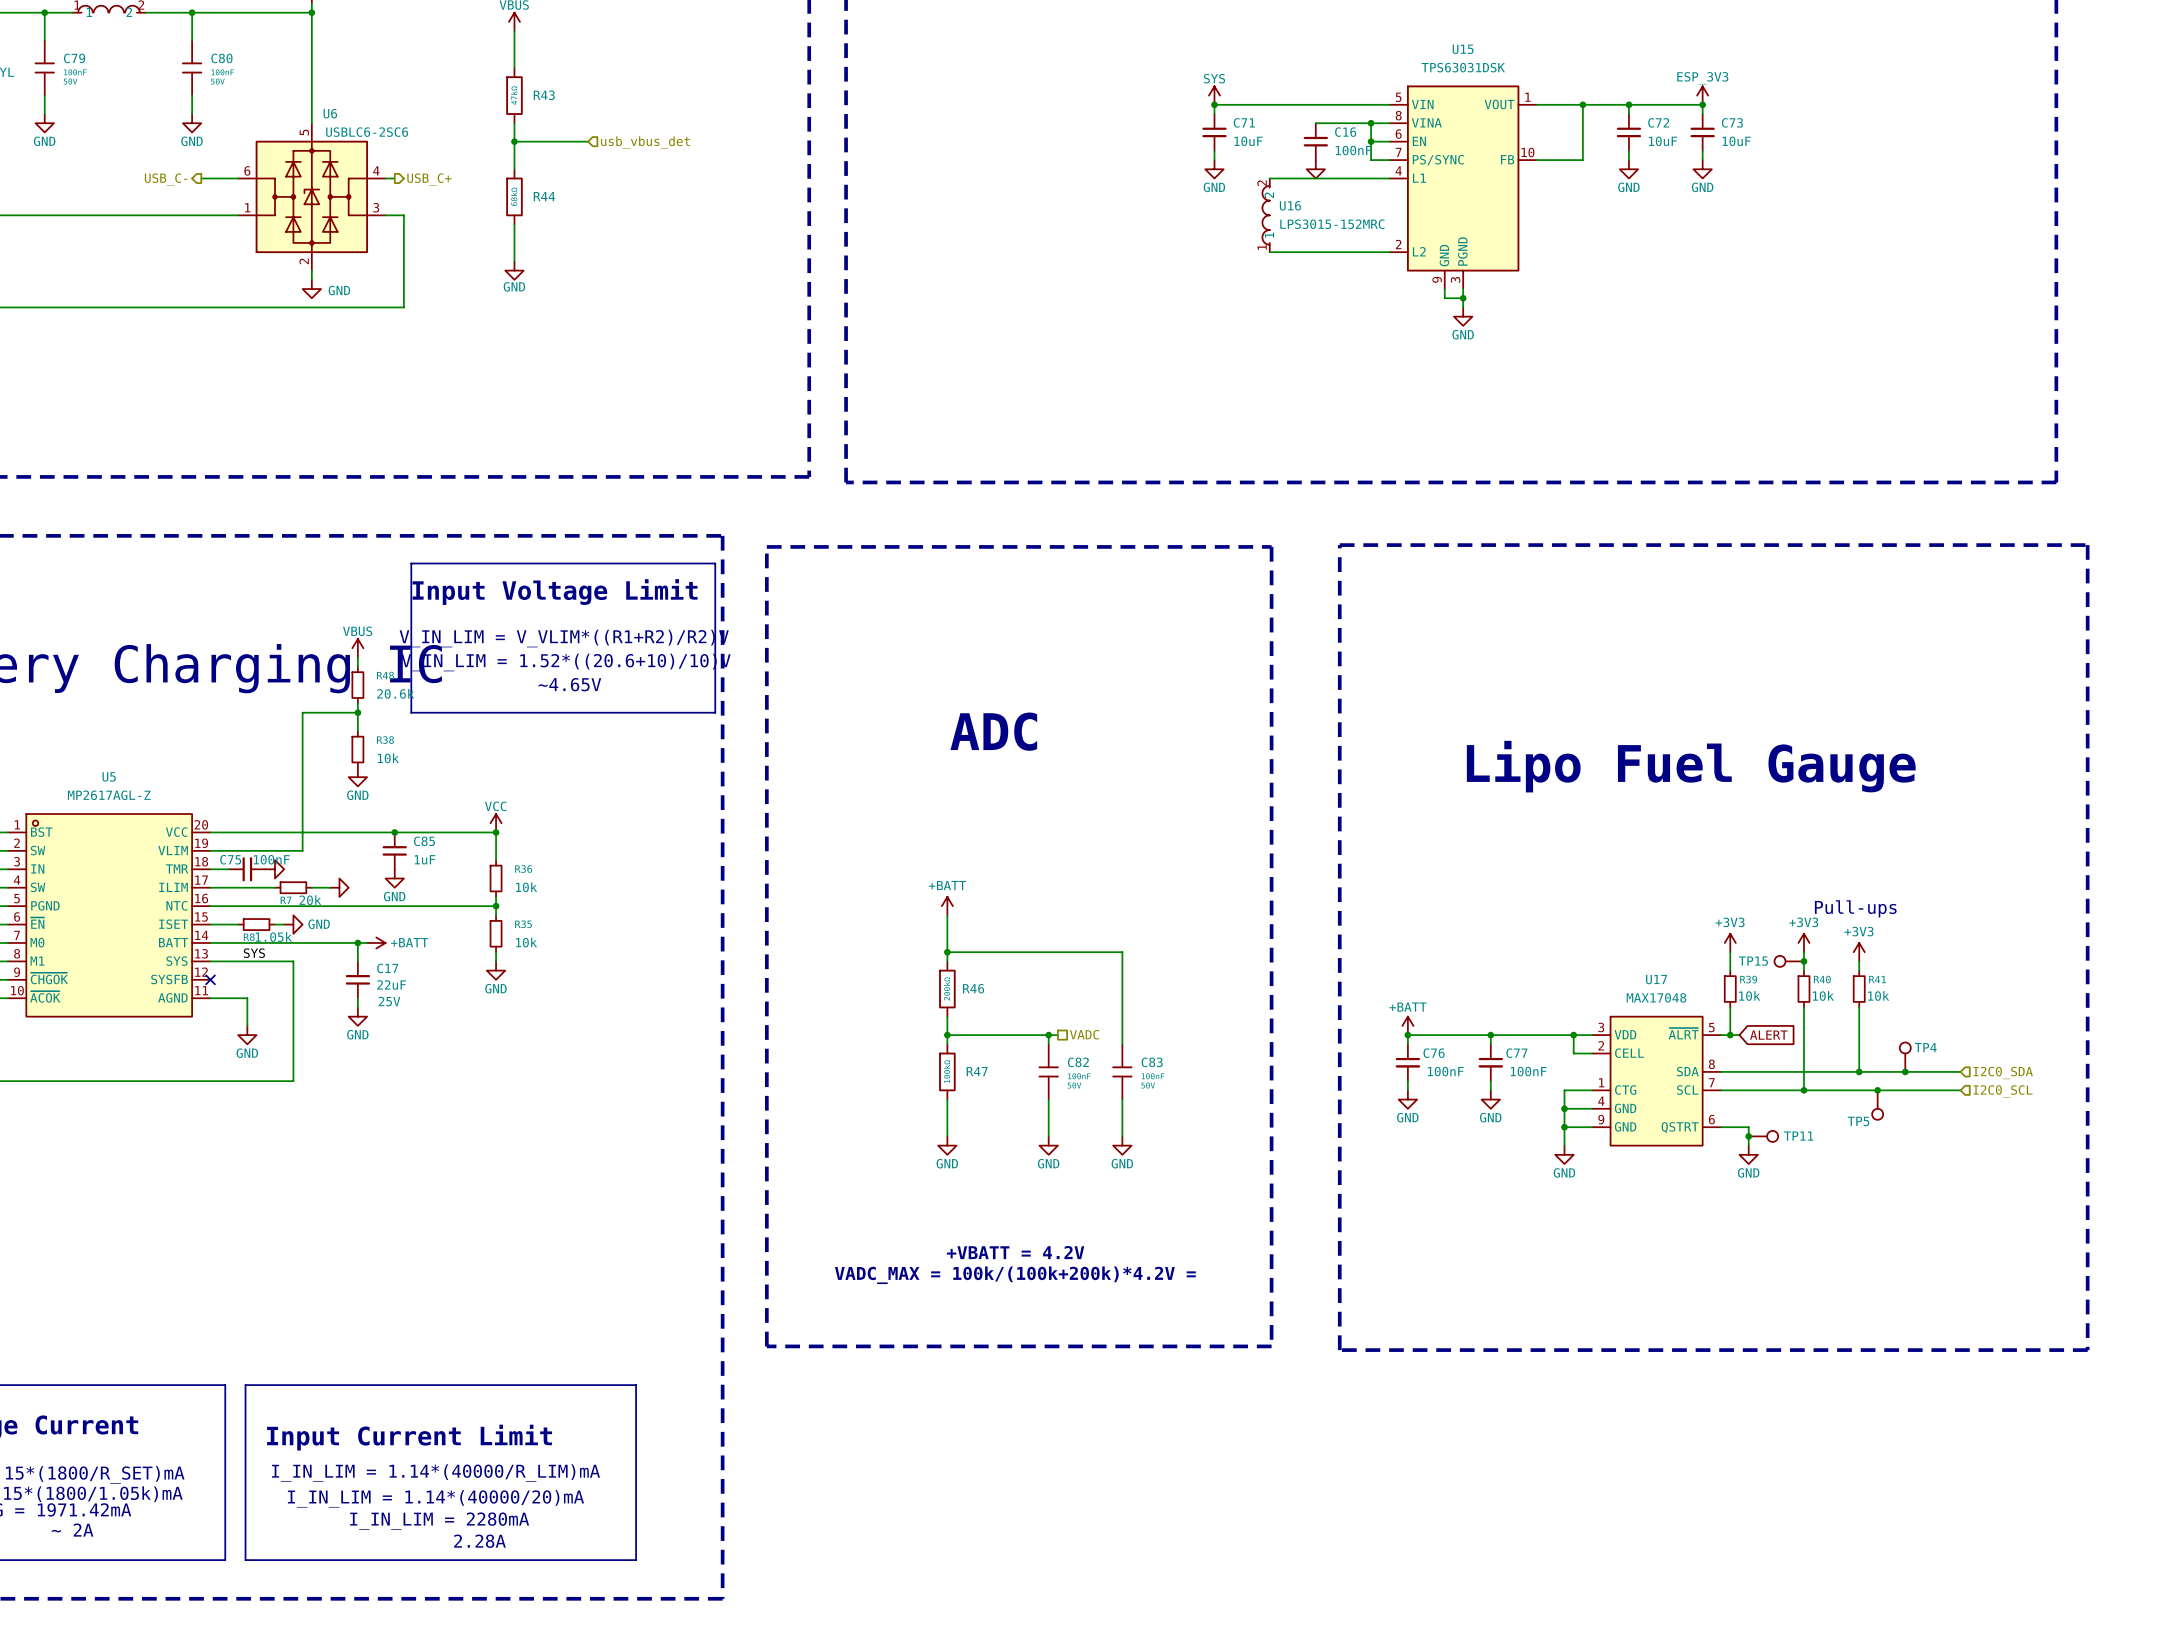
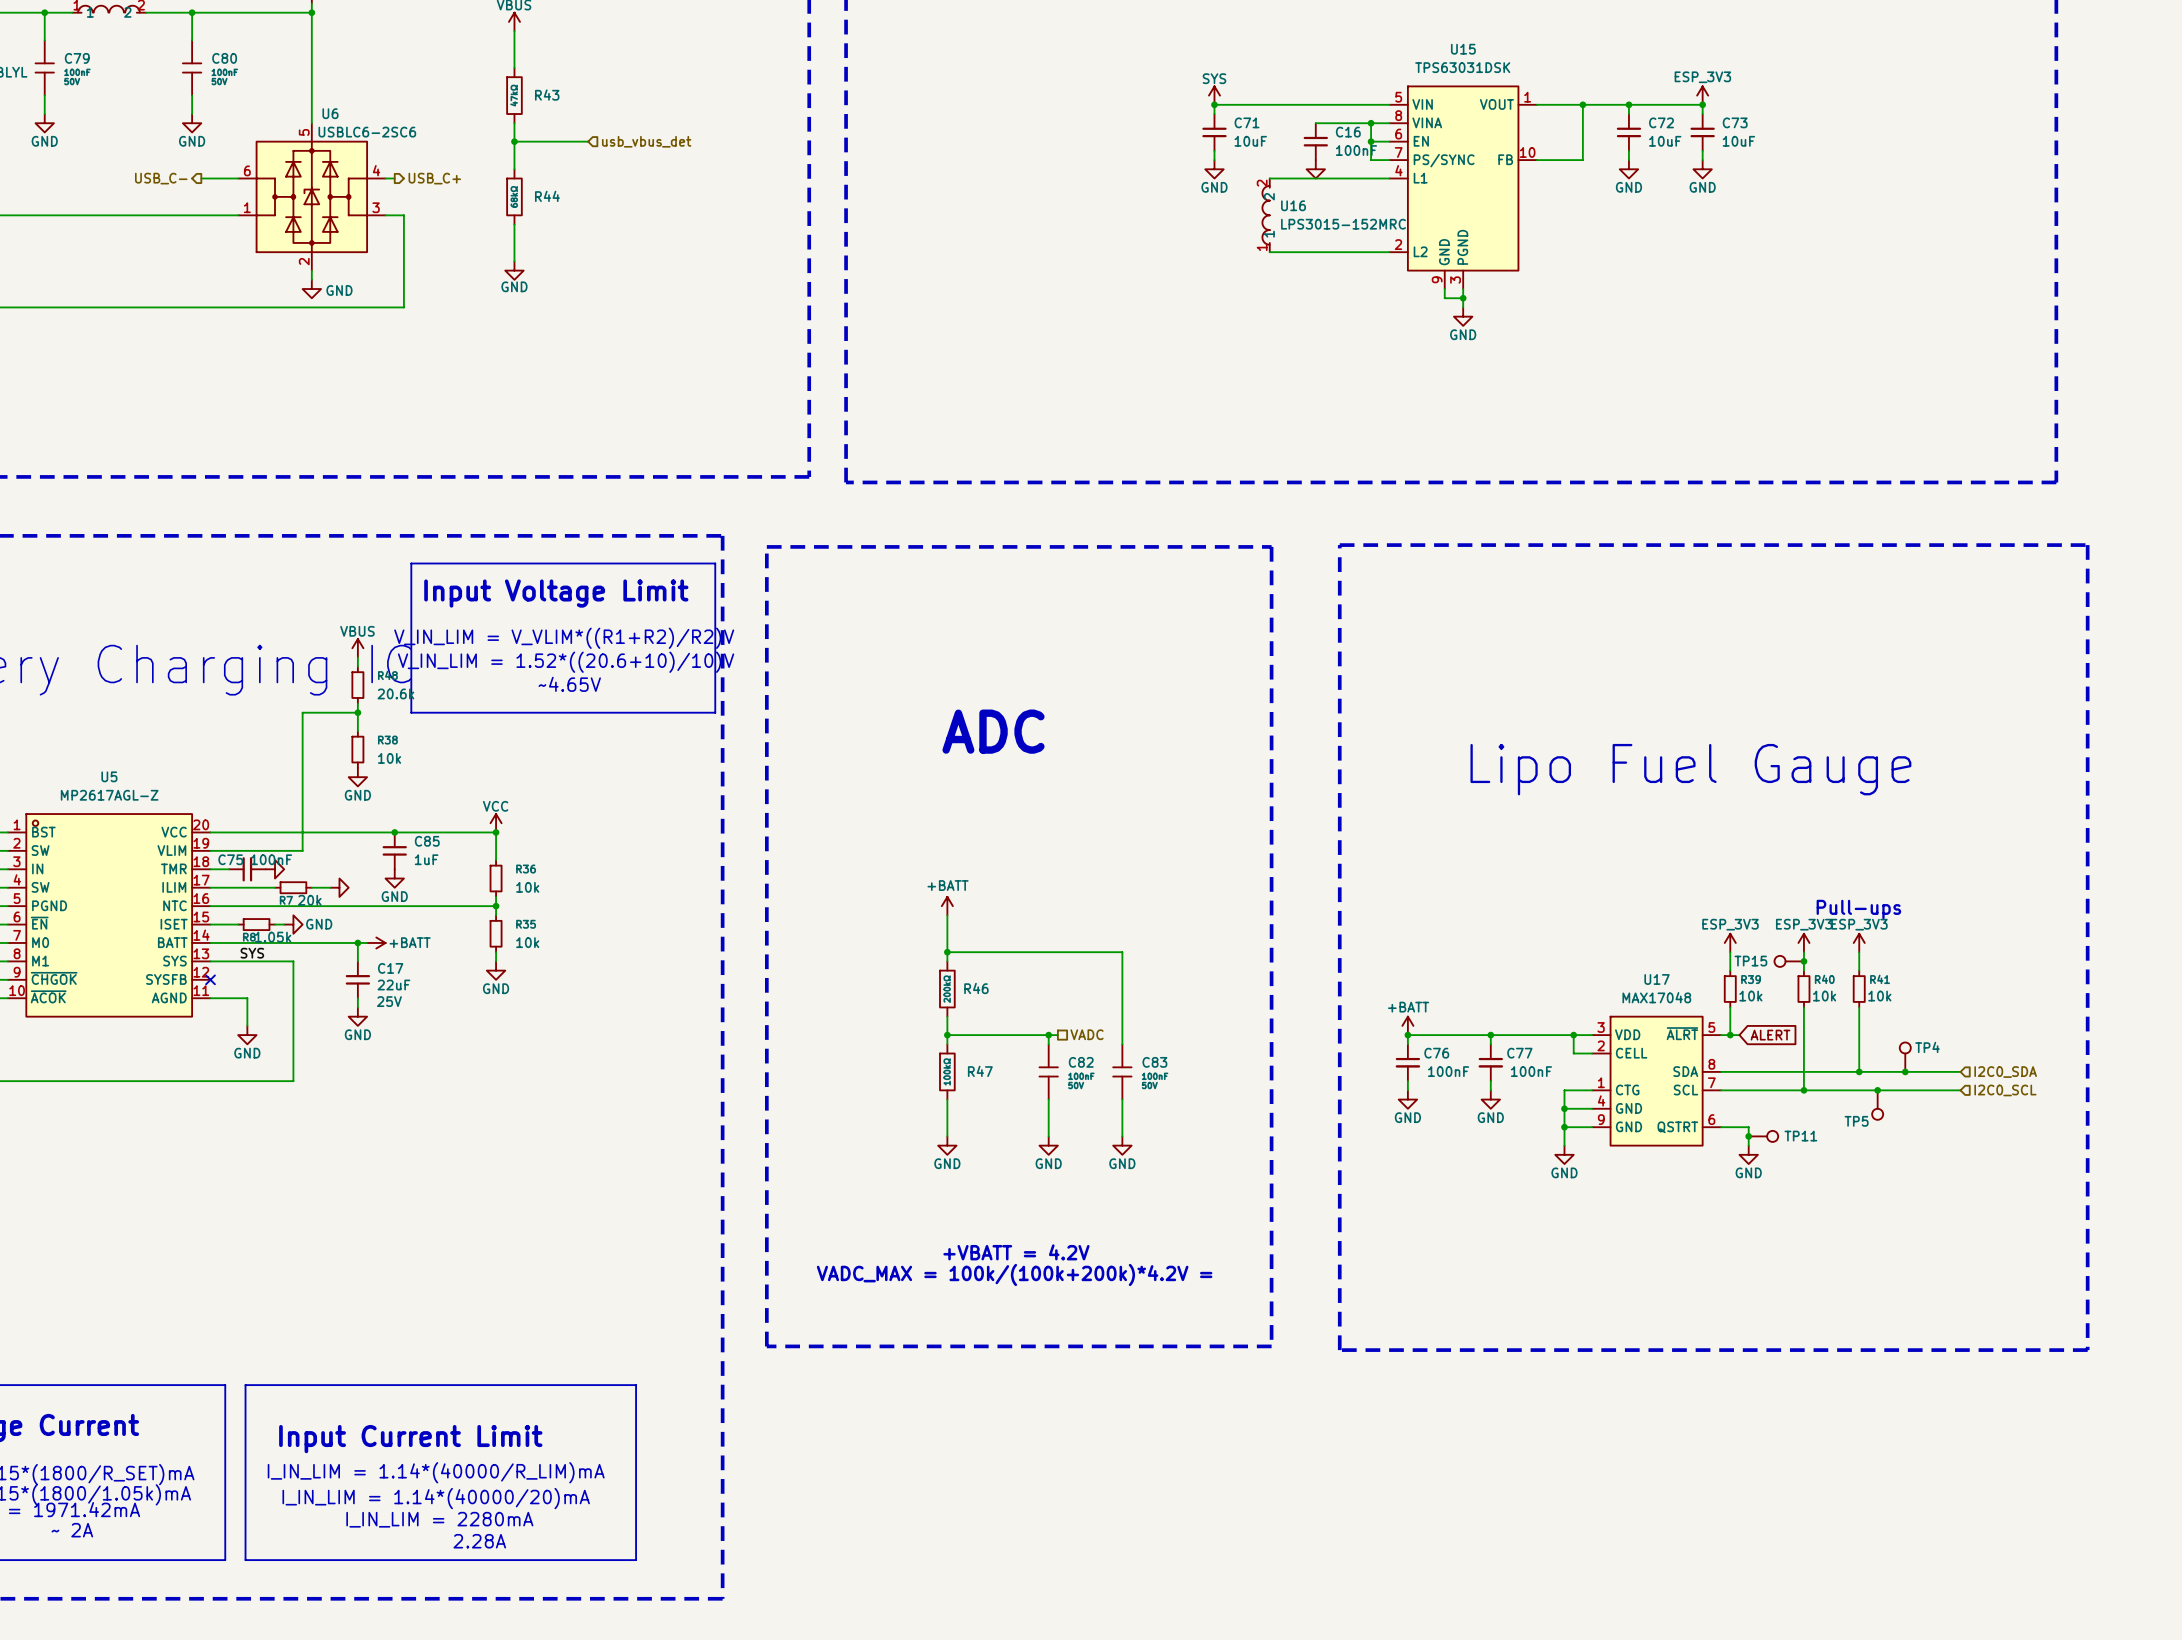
power symbol: +3V3 (1730, 942) -> ESP_3V3 (1730, 942)
power symbol: +3V3 (1803, 942) -> ESP_3V3 (1803, 942)
power symbol: none -> ESP_3V3 (1859, 942)
power symbol: +3V3 (1859, 952) -> none

